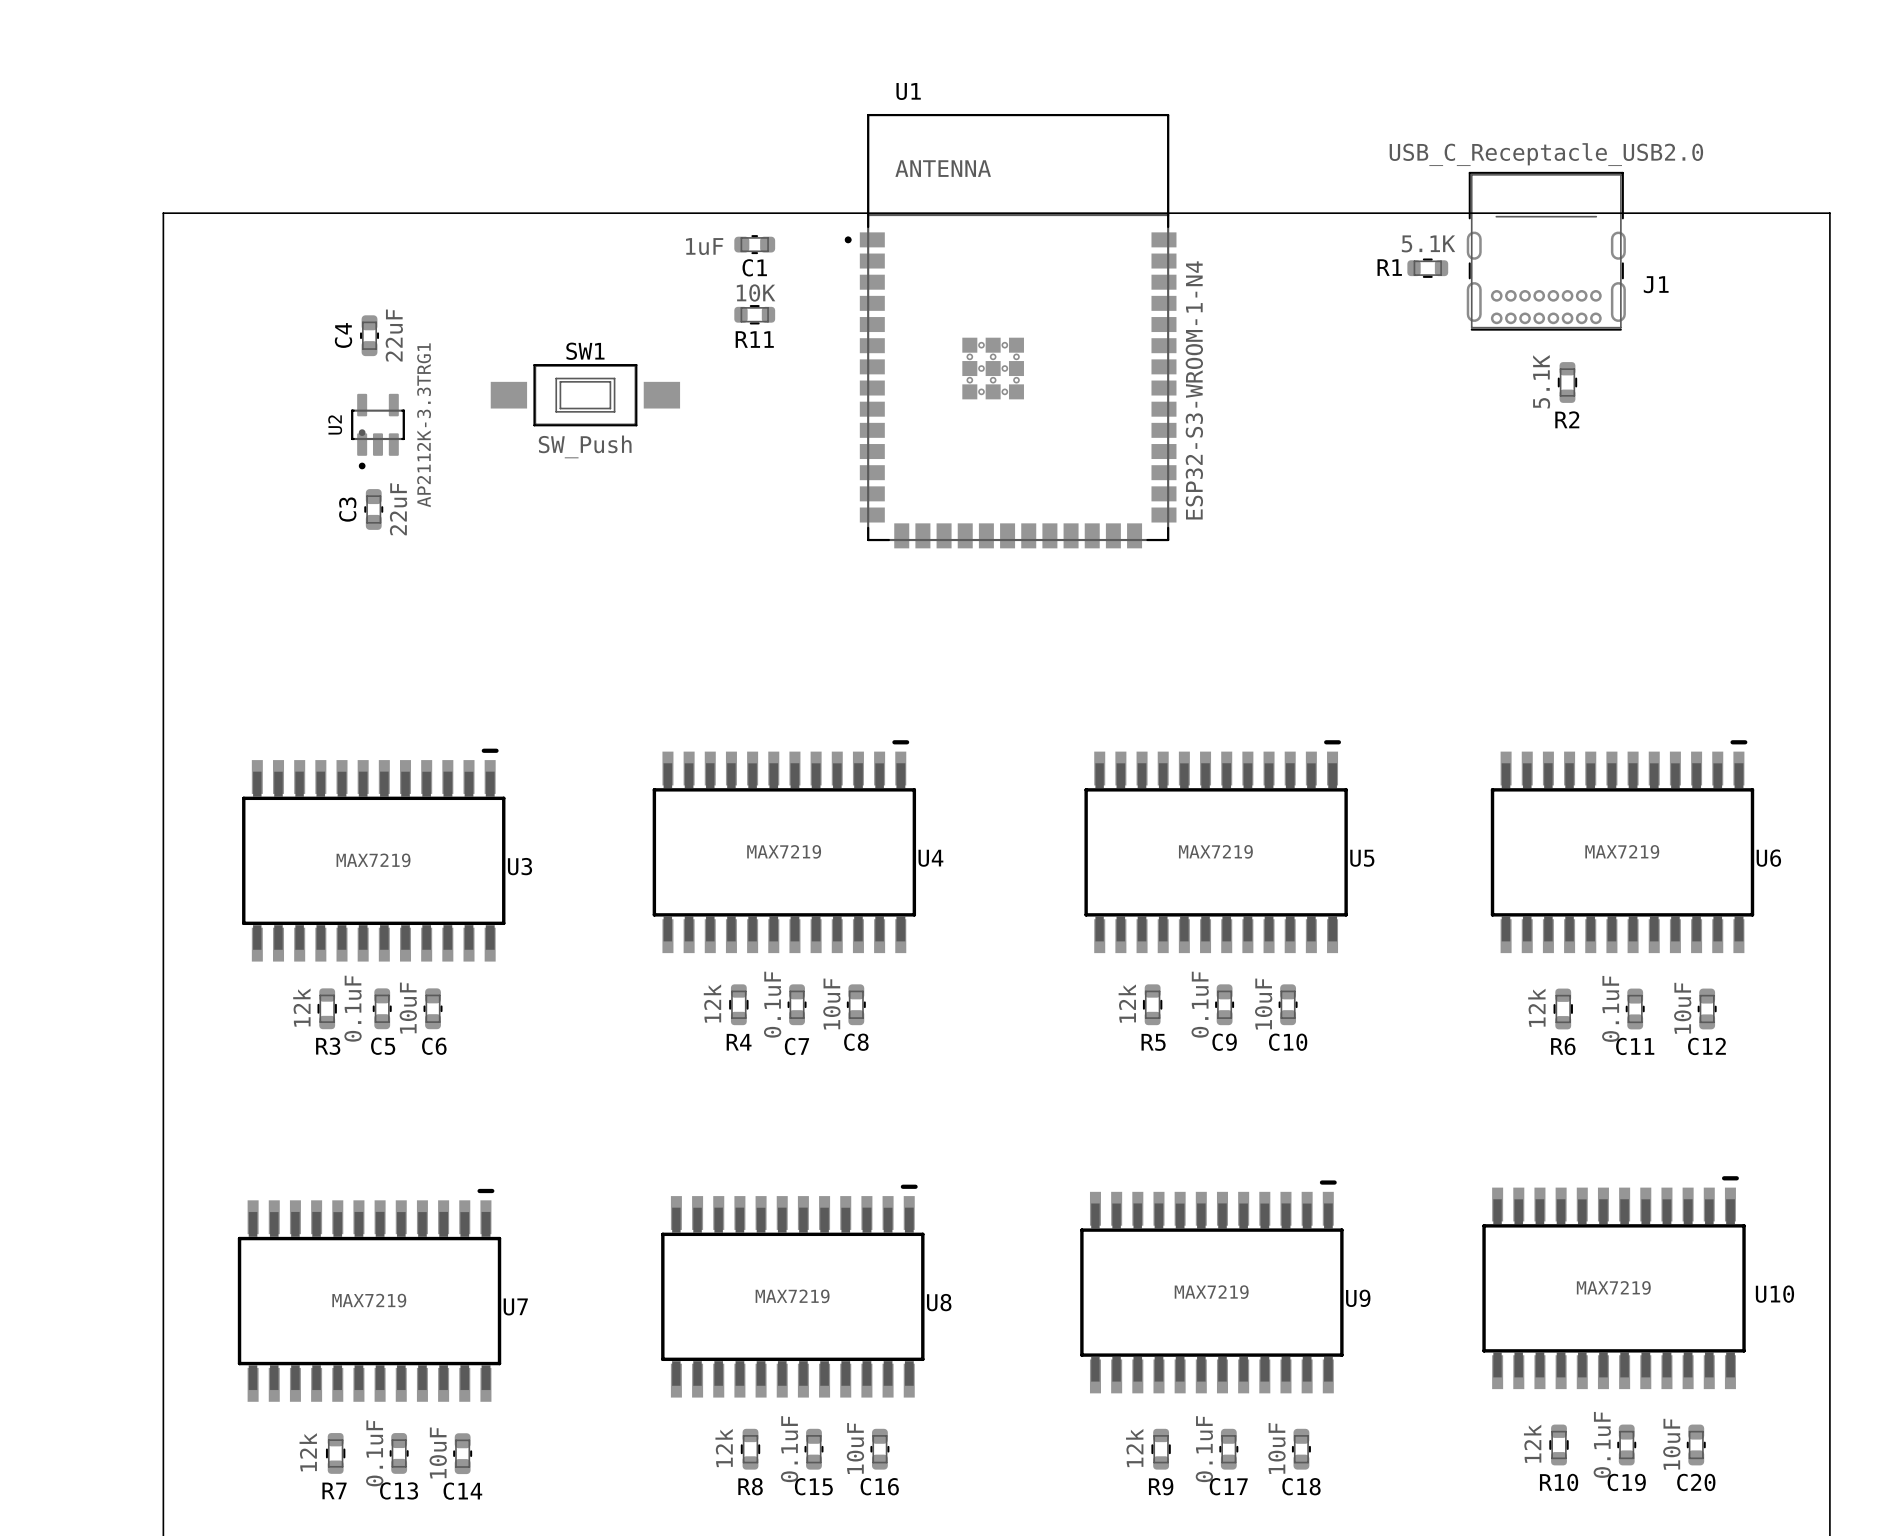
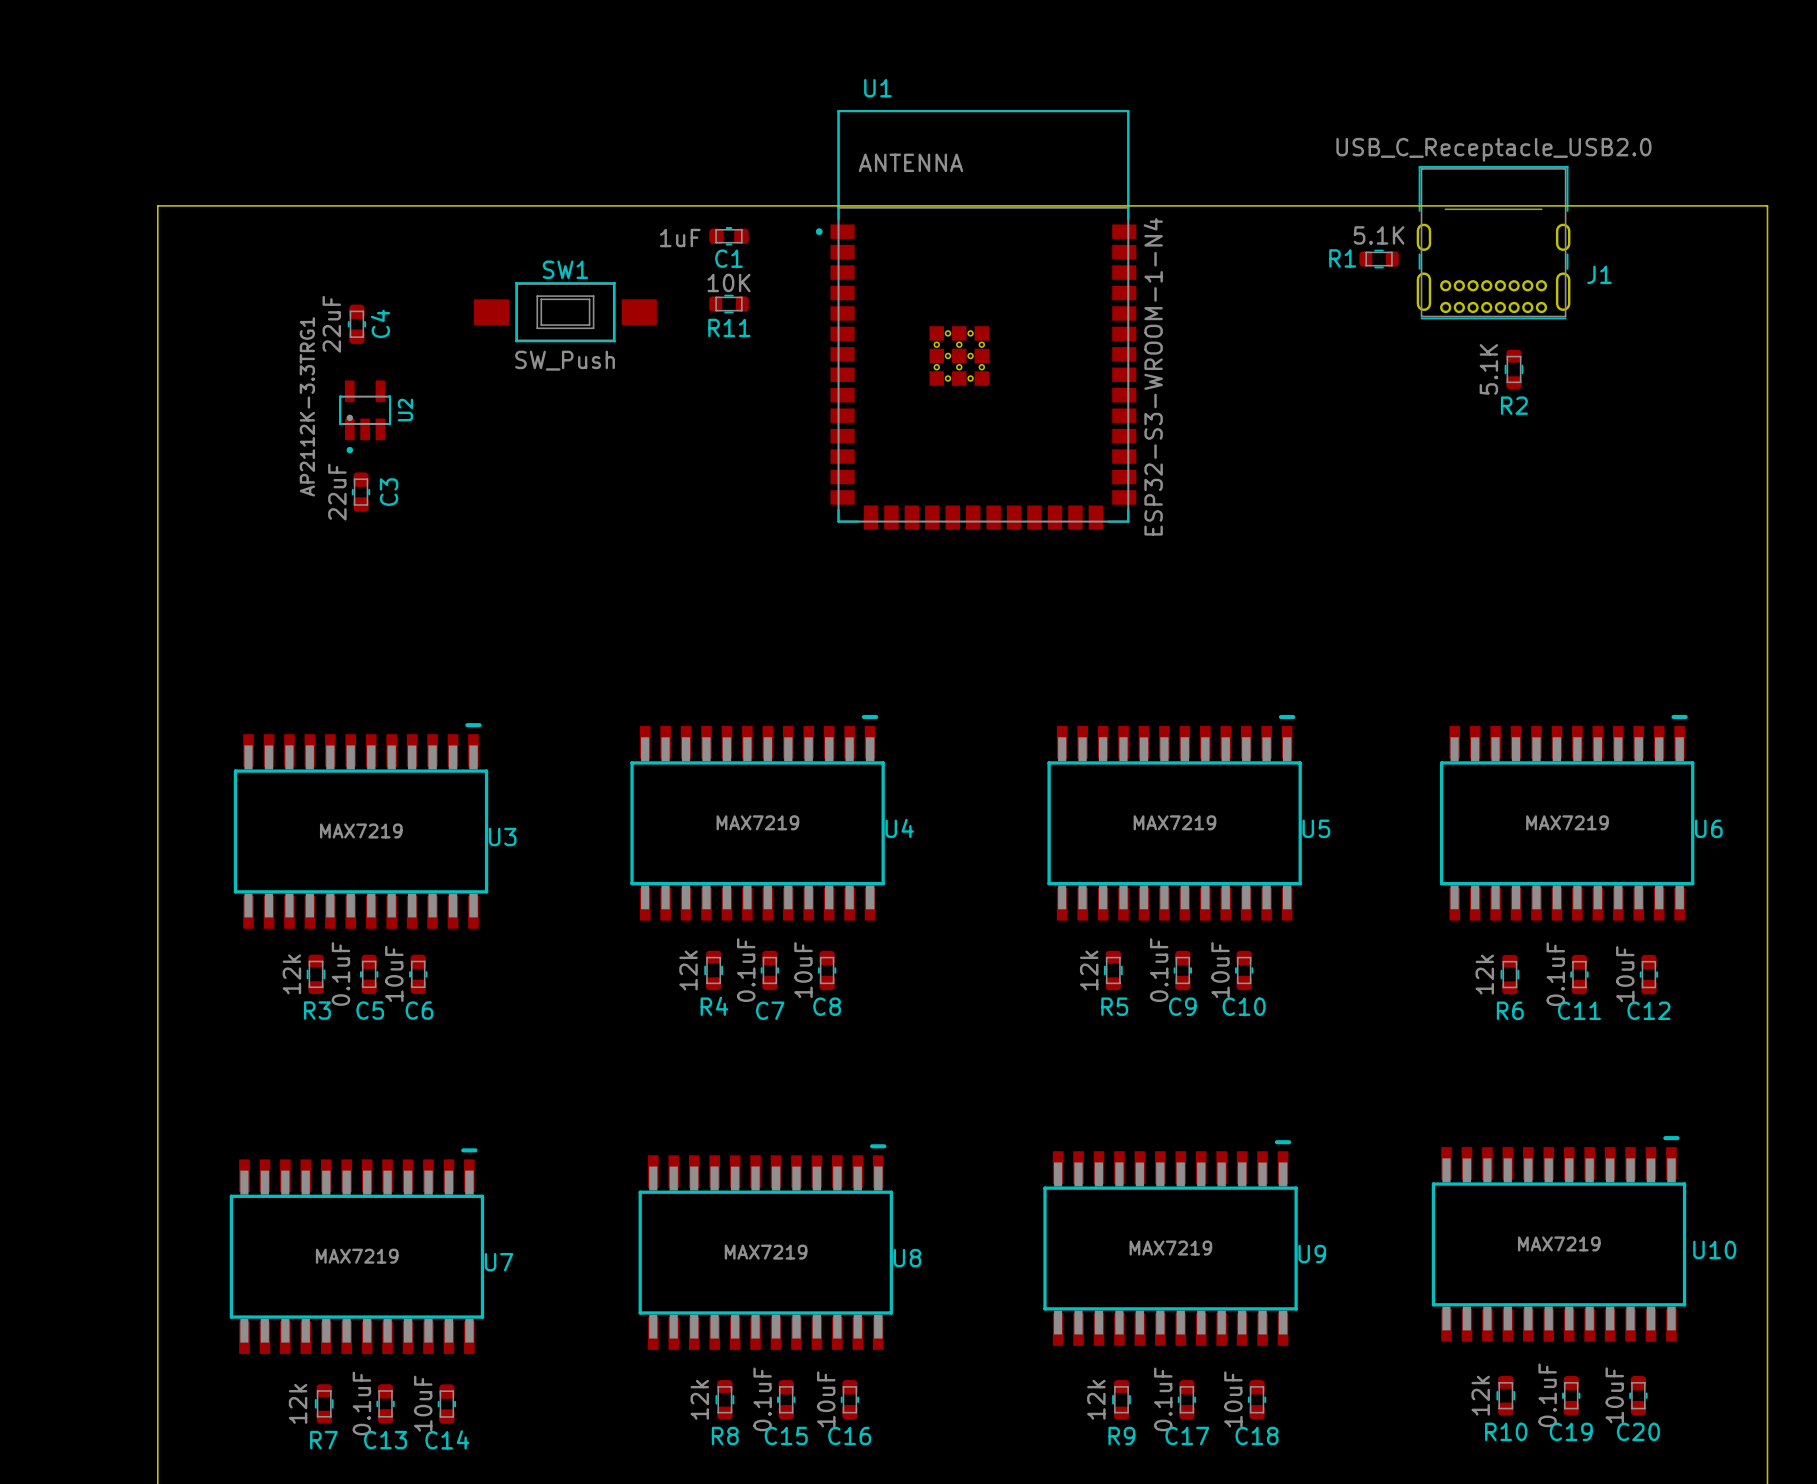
C4 name position: C4 (343, 335) -> C4 (380, 323)
C4 value position: 22uF (394, 335) -> 22uF (331, 324)
SW1 position: (585, 395) -> (565, 312)
U2 name position: U2 (335, 424) -> U2 (405, 410)
U2 value position: AP2112K-3.3TRG1 (424, 425) -> AP2112K-3.3TRG1 (307, 406)
C3 name position: C3 (347, 509) -> C3 (389, 492)
C3 value position: 22uF (398, 509) -> 22uF (337, 492)

